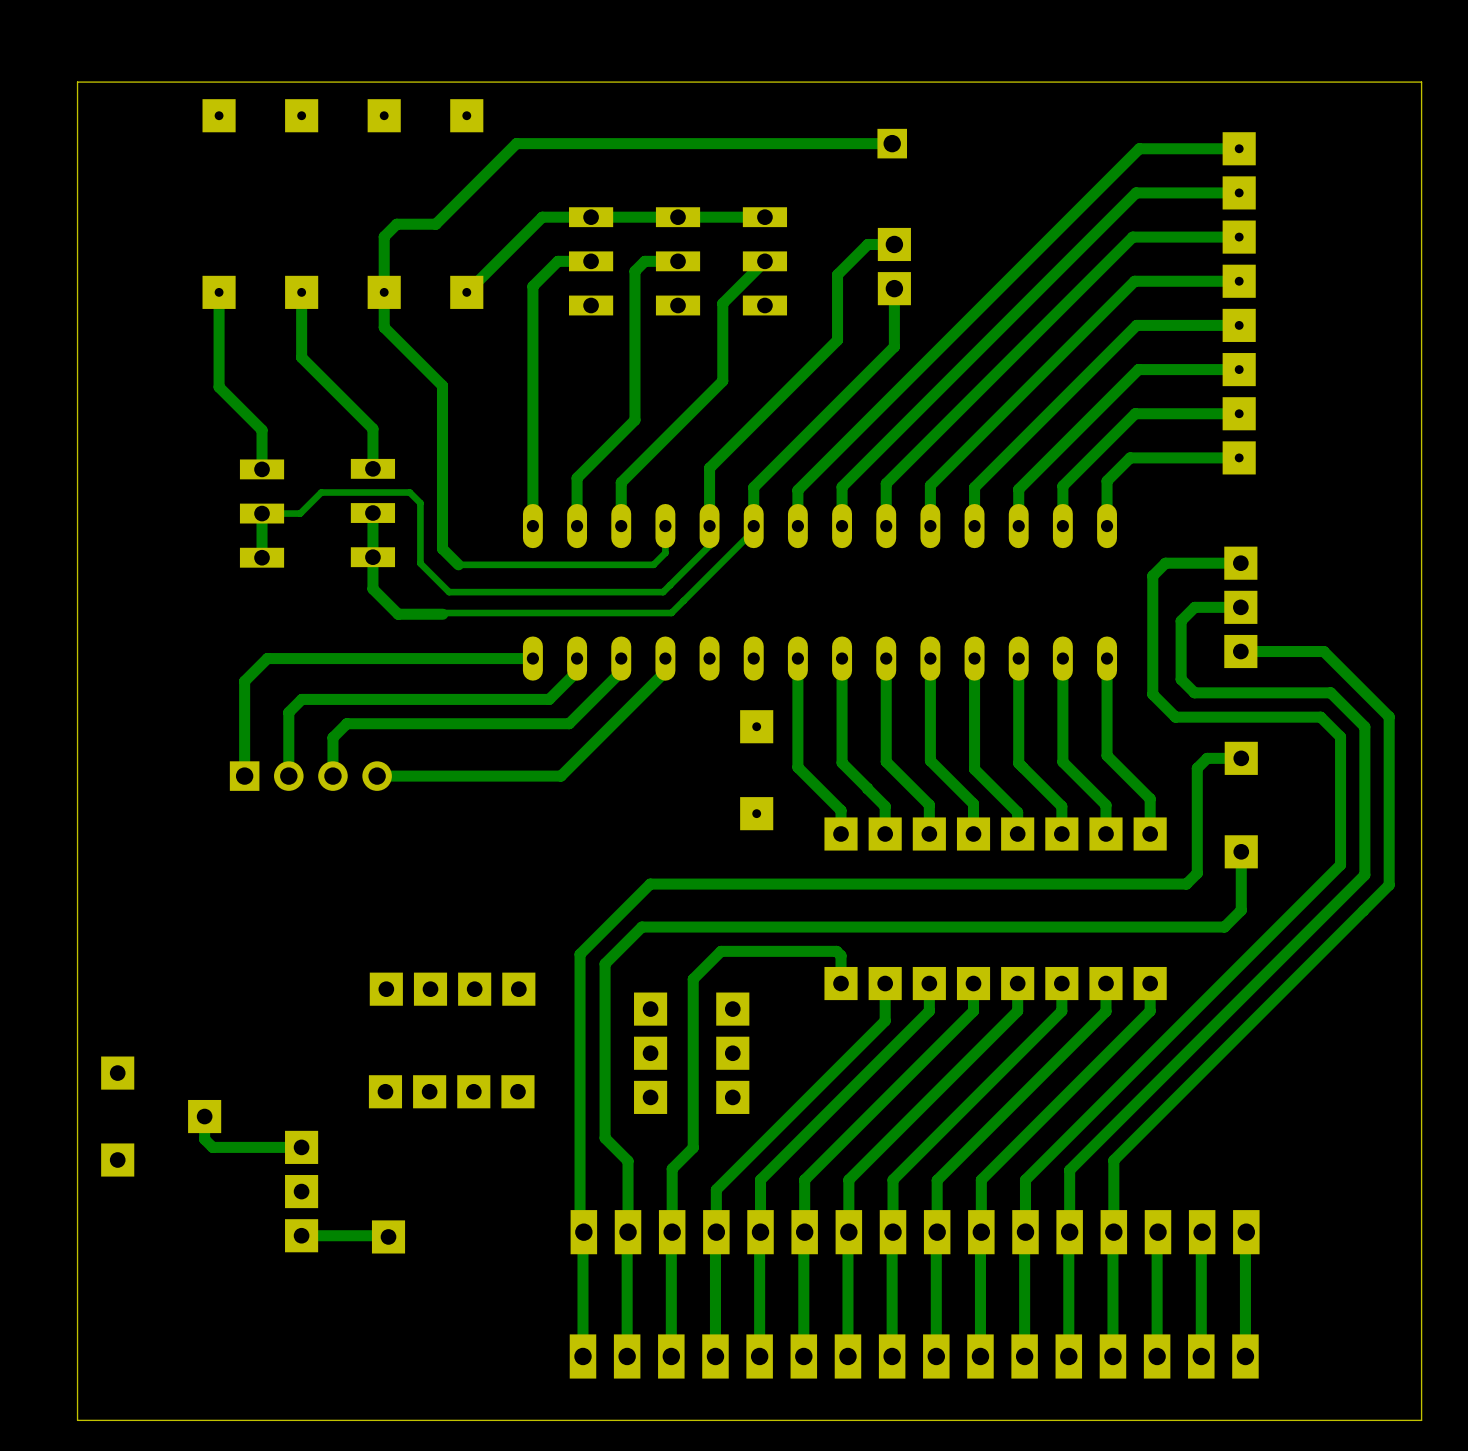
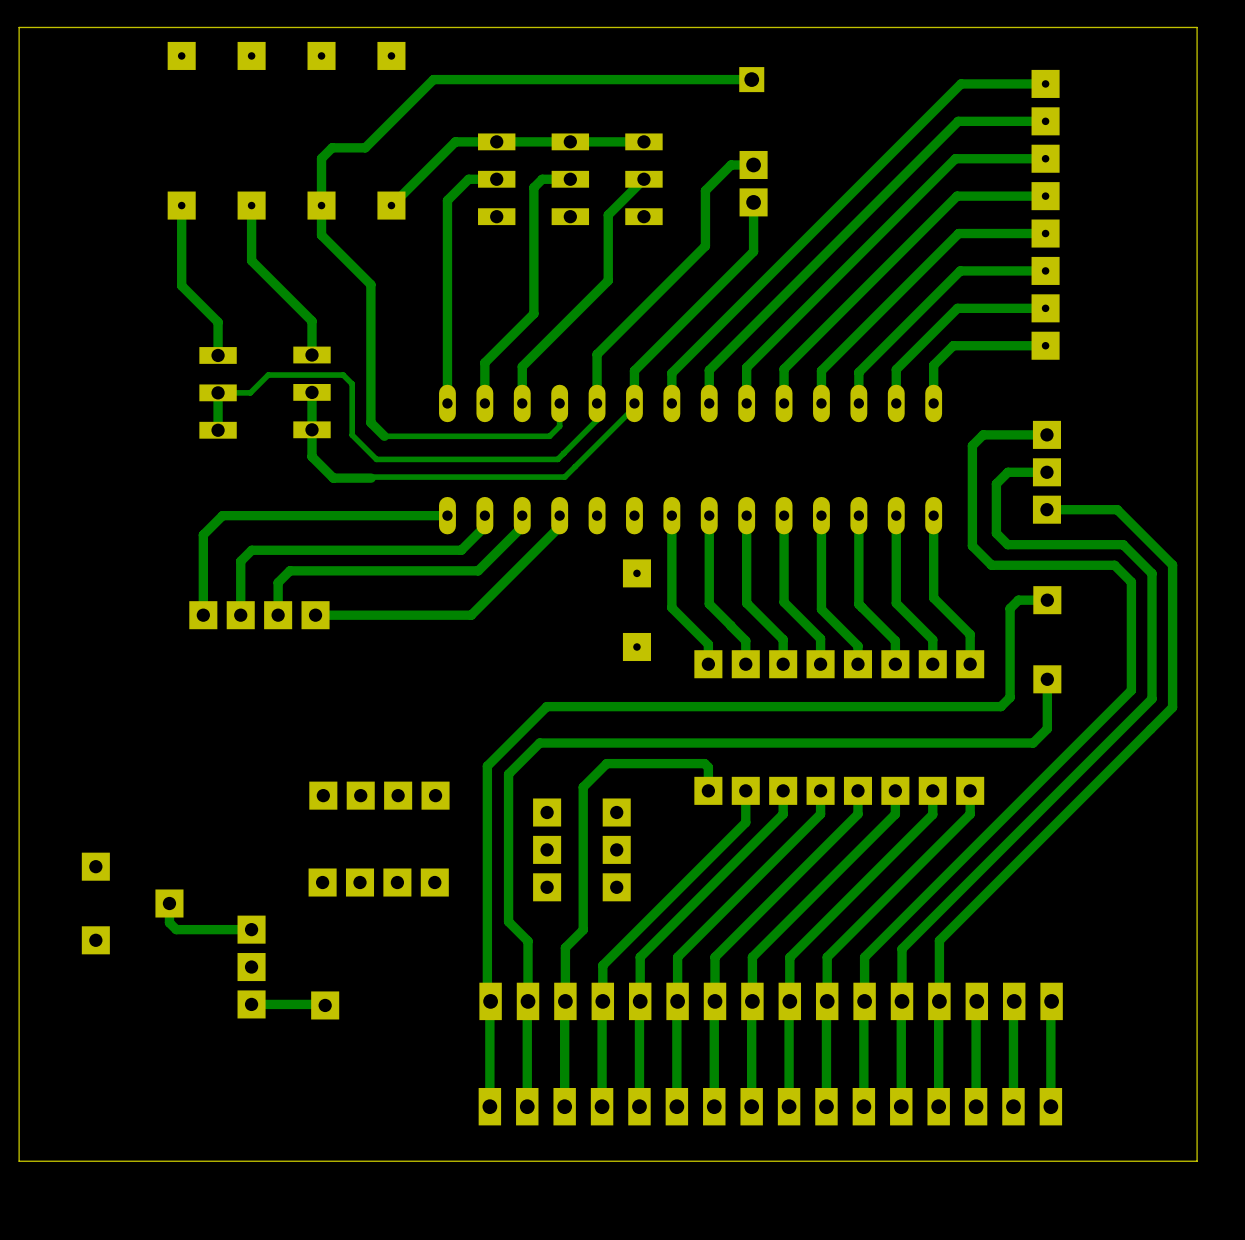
board edge: (1418, 82) (1421, 82) (1421, 1420) (77, 1420) (77, 82) -> (1197, 27) (1197, 1161) (19, 1161) (19, 27) (61, 27)
part footprint: [229, 761, 392, 791] -> [189, 601, 330, 630]

